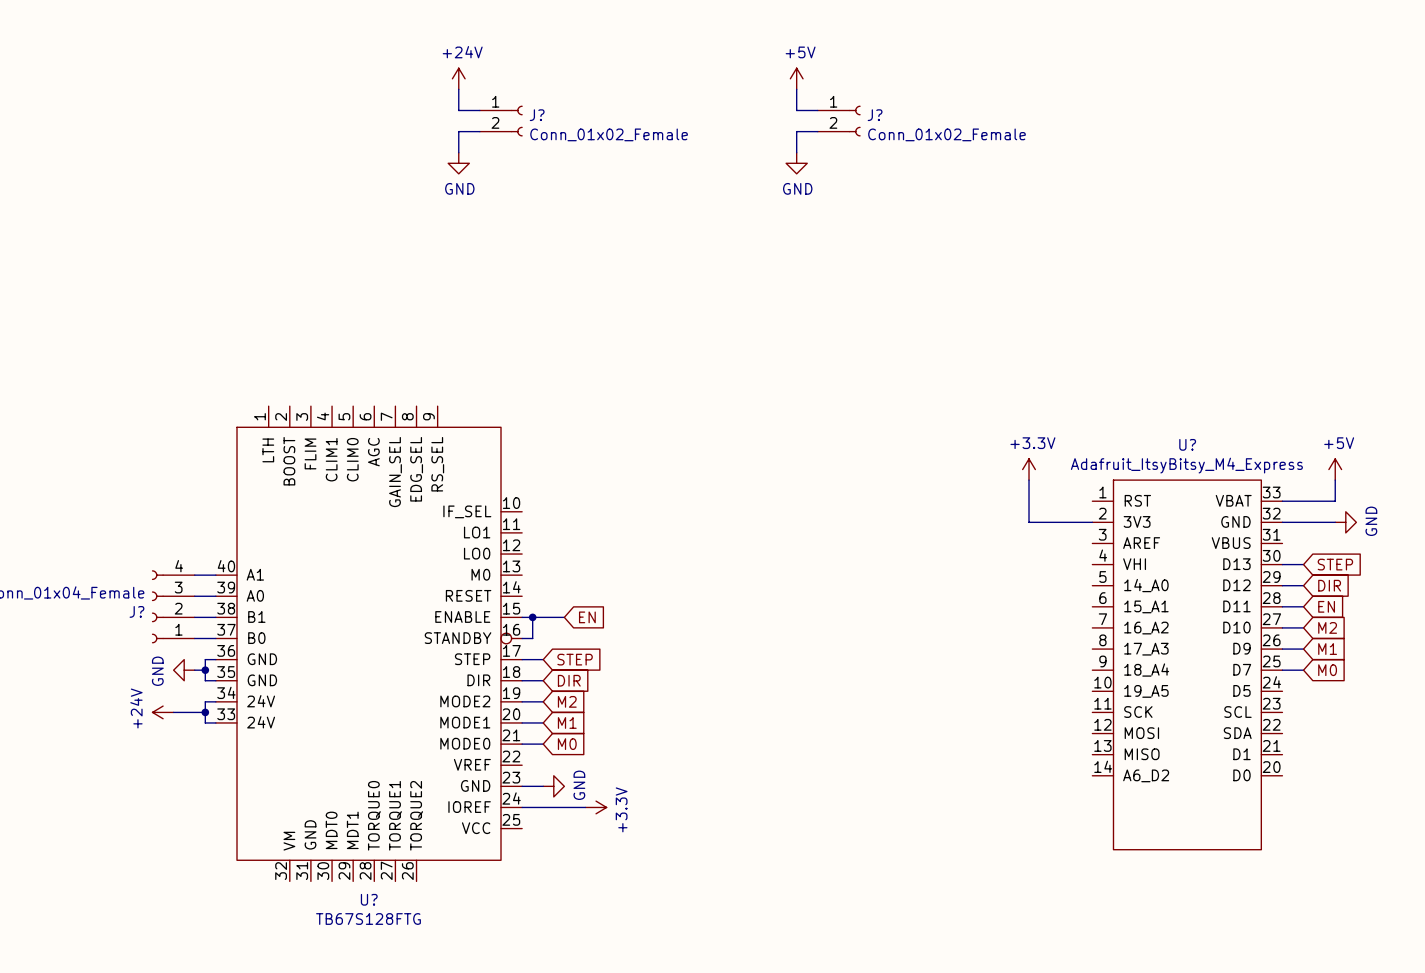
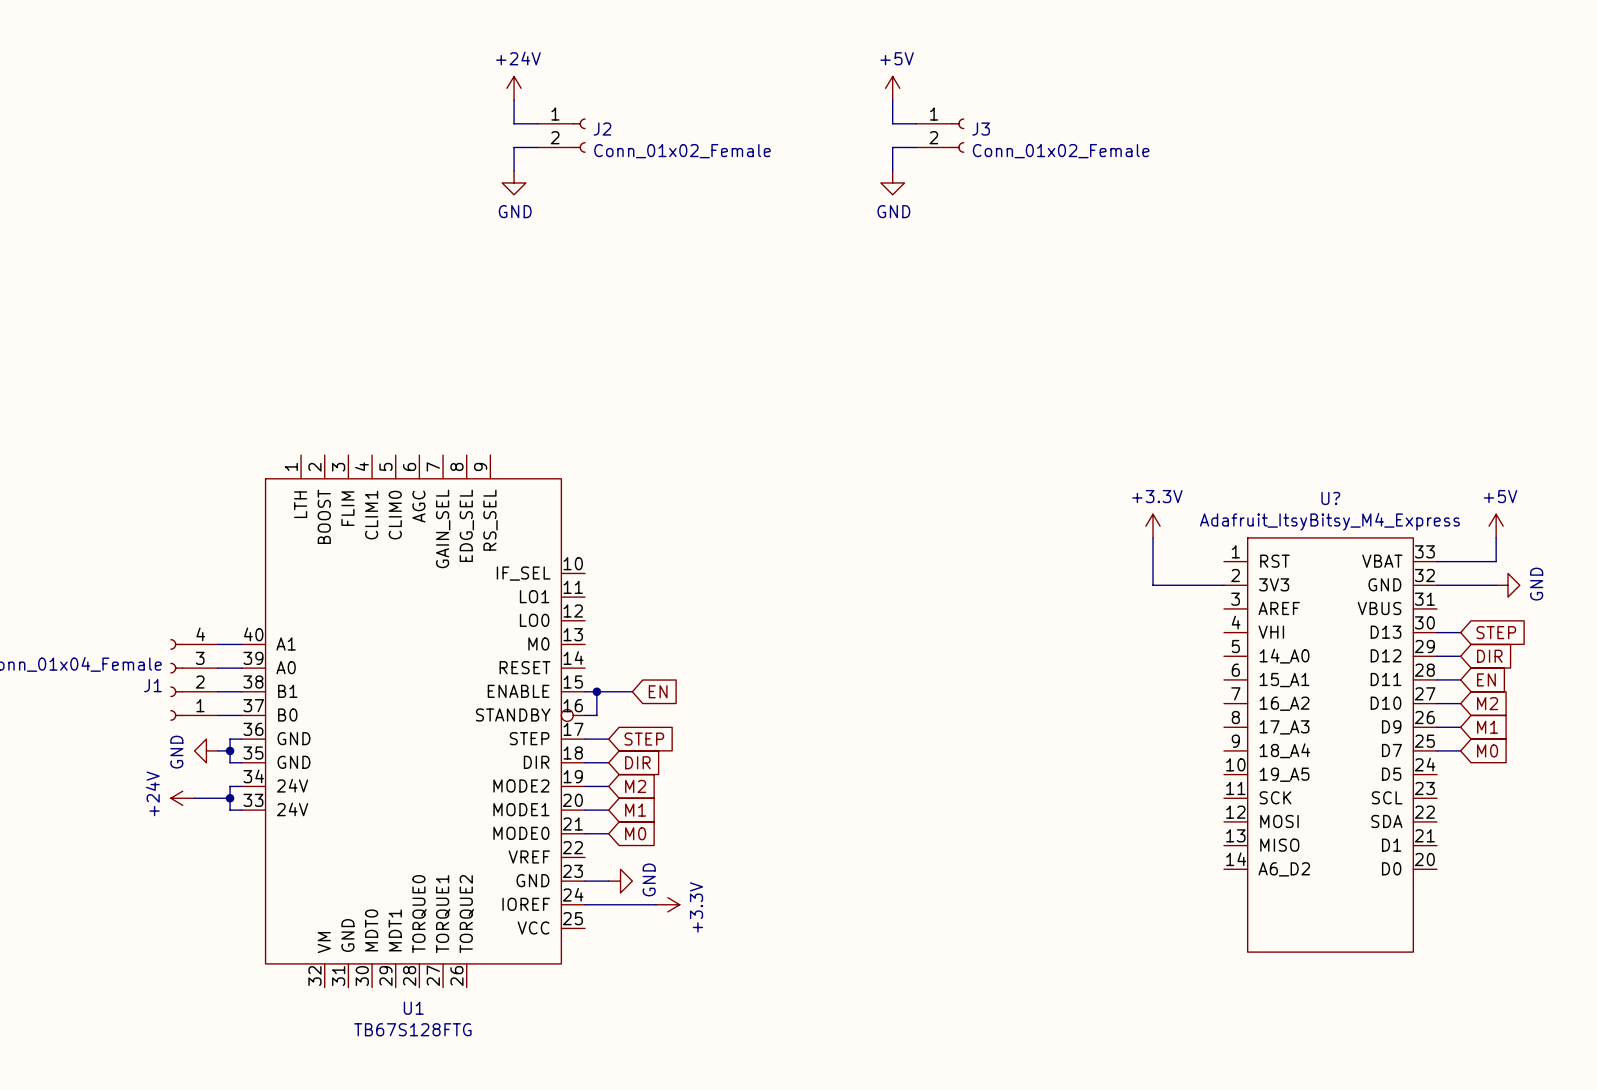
J? name: J? (537, 115) -> J2 (602, 129)
J? name: J? (875, 115) -> J3 (981, 129)
J? name: J? (136, 611) -> J1 (152, 685)
U? name: U? (369, 899) -> U1 (413, 1008)

